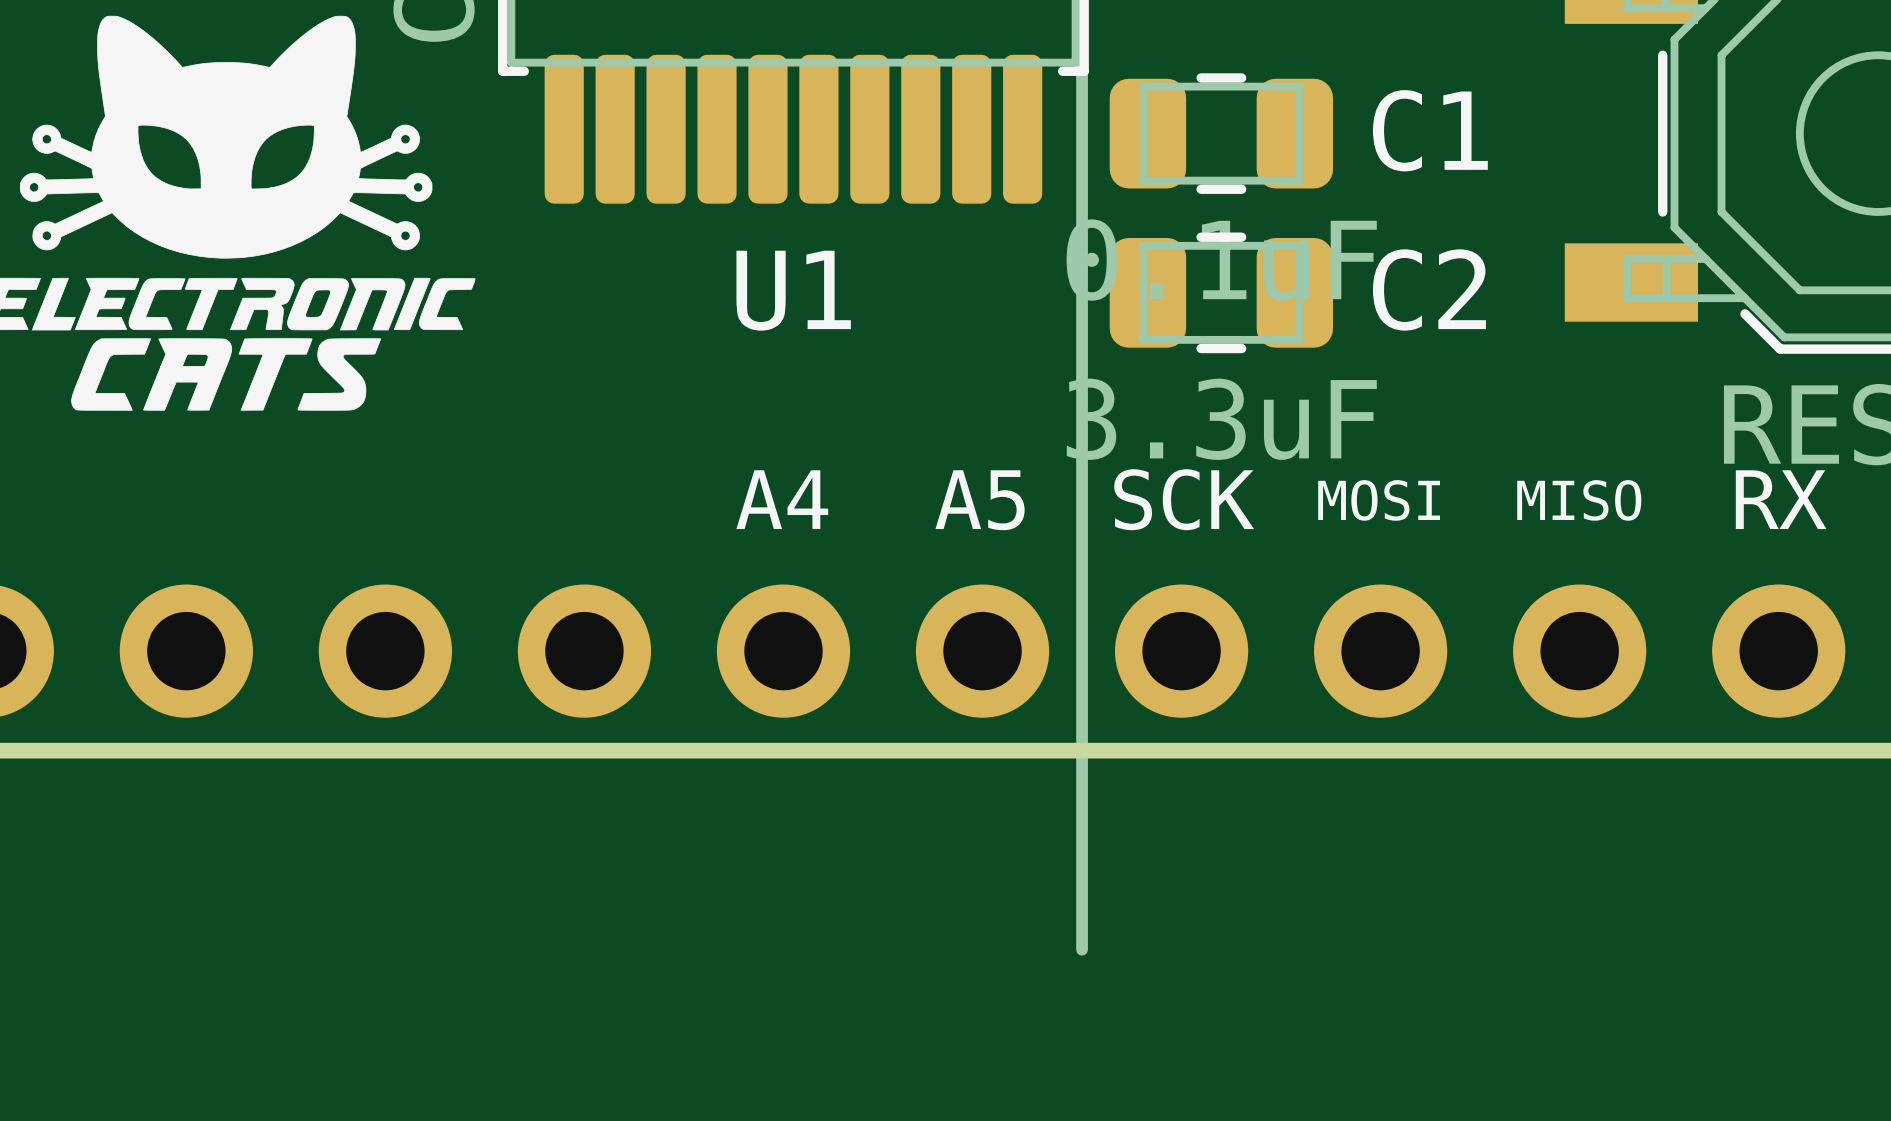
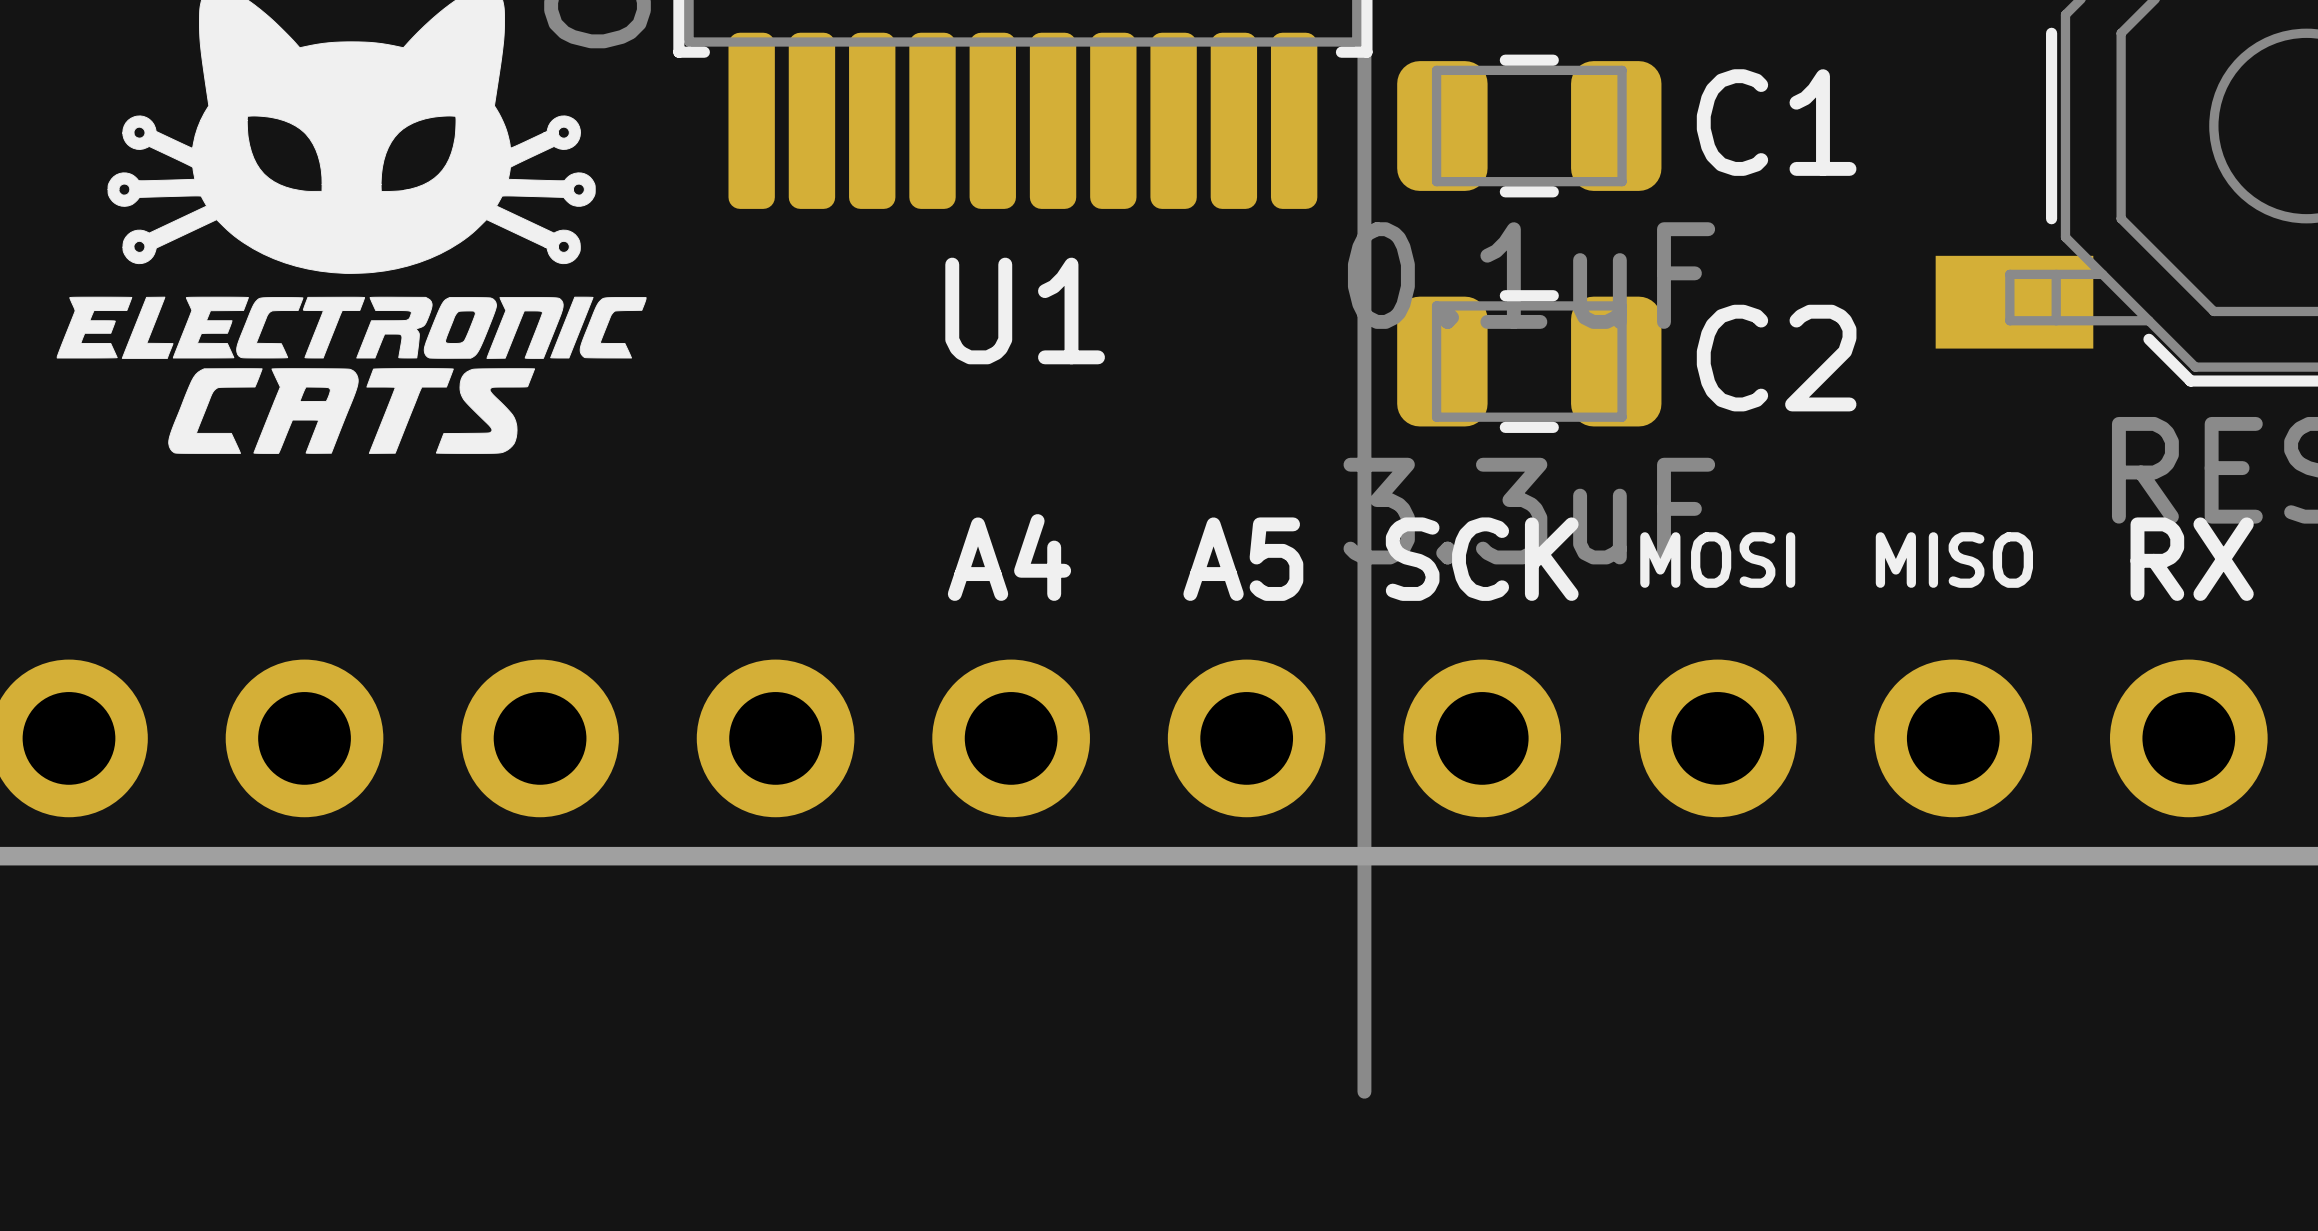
C2 position: (1221, 292) -> (1529, 361)

